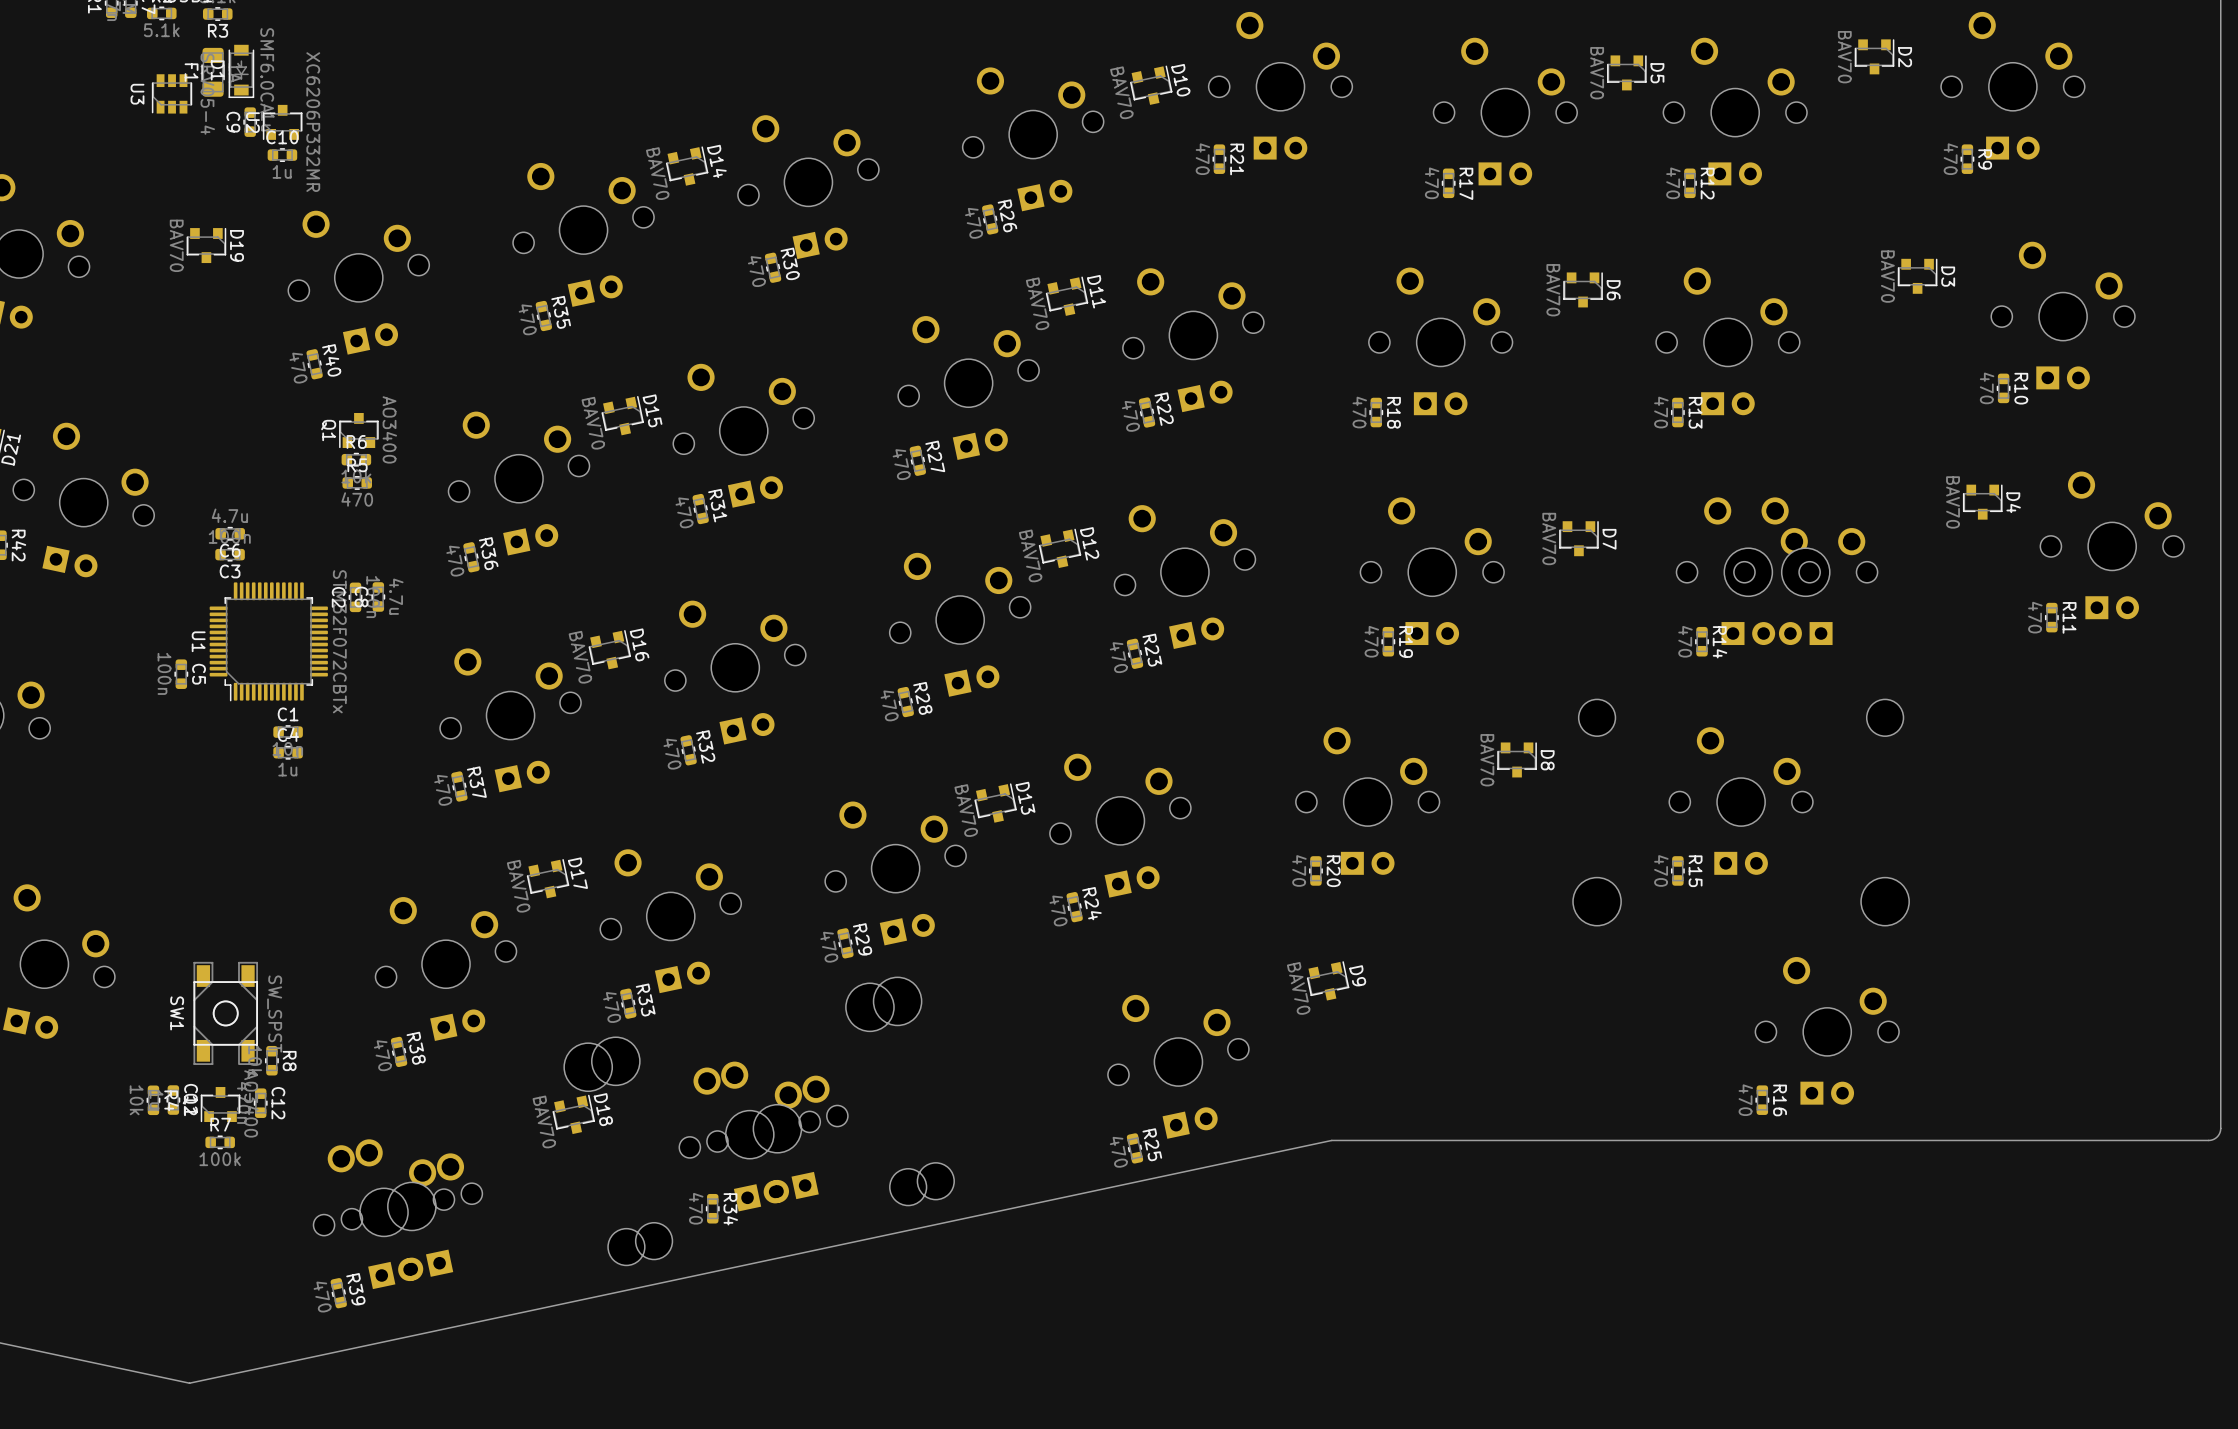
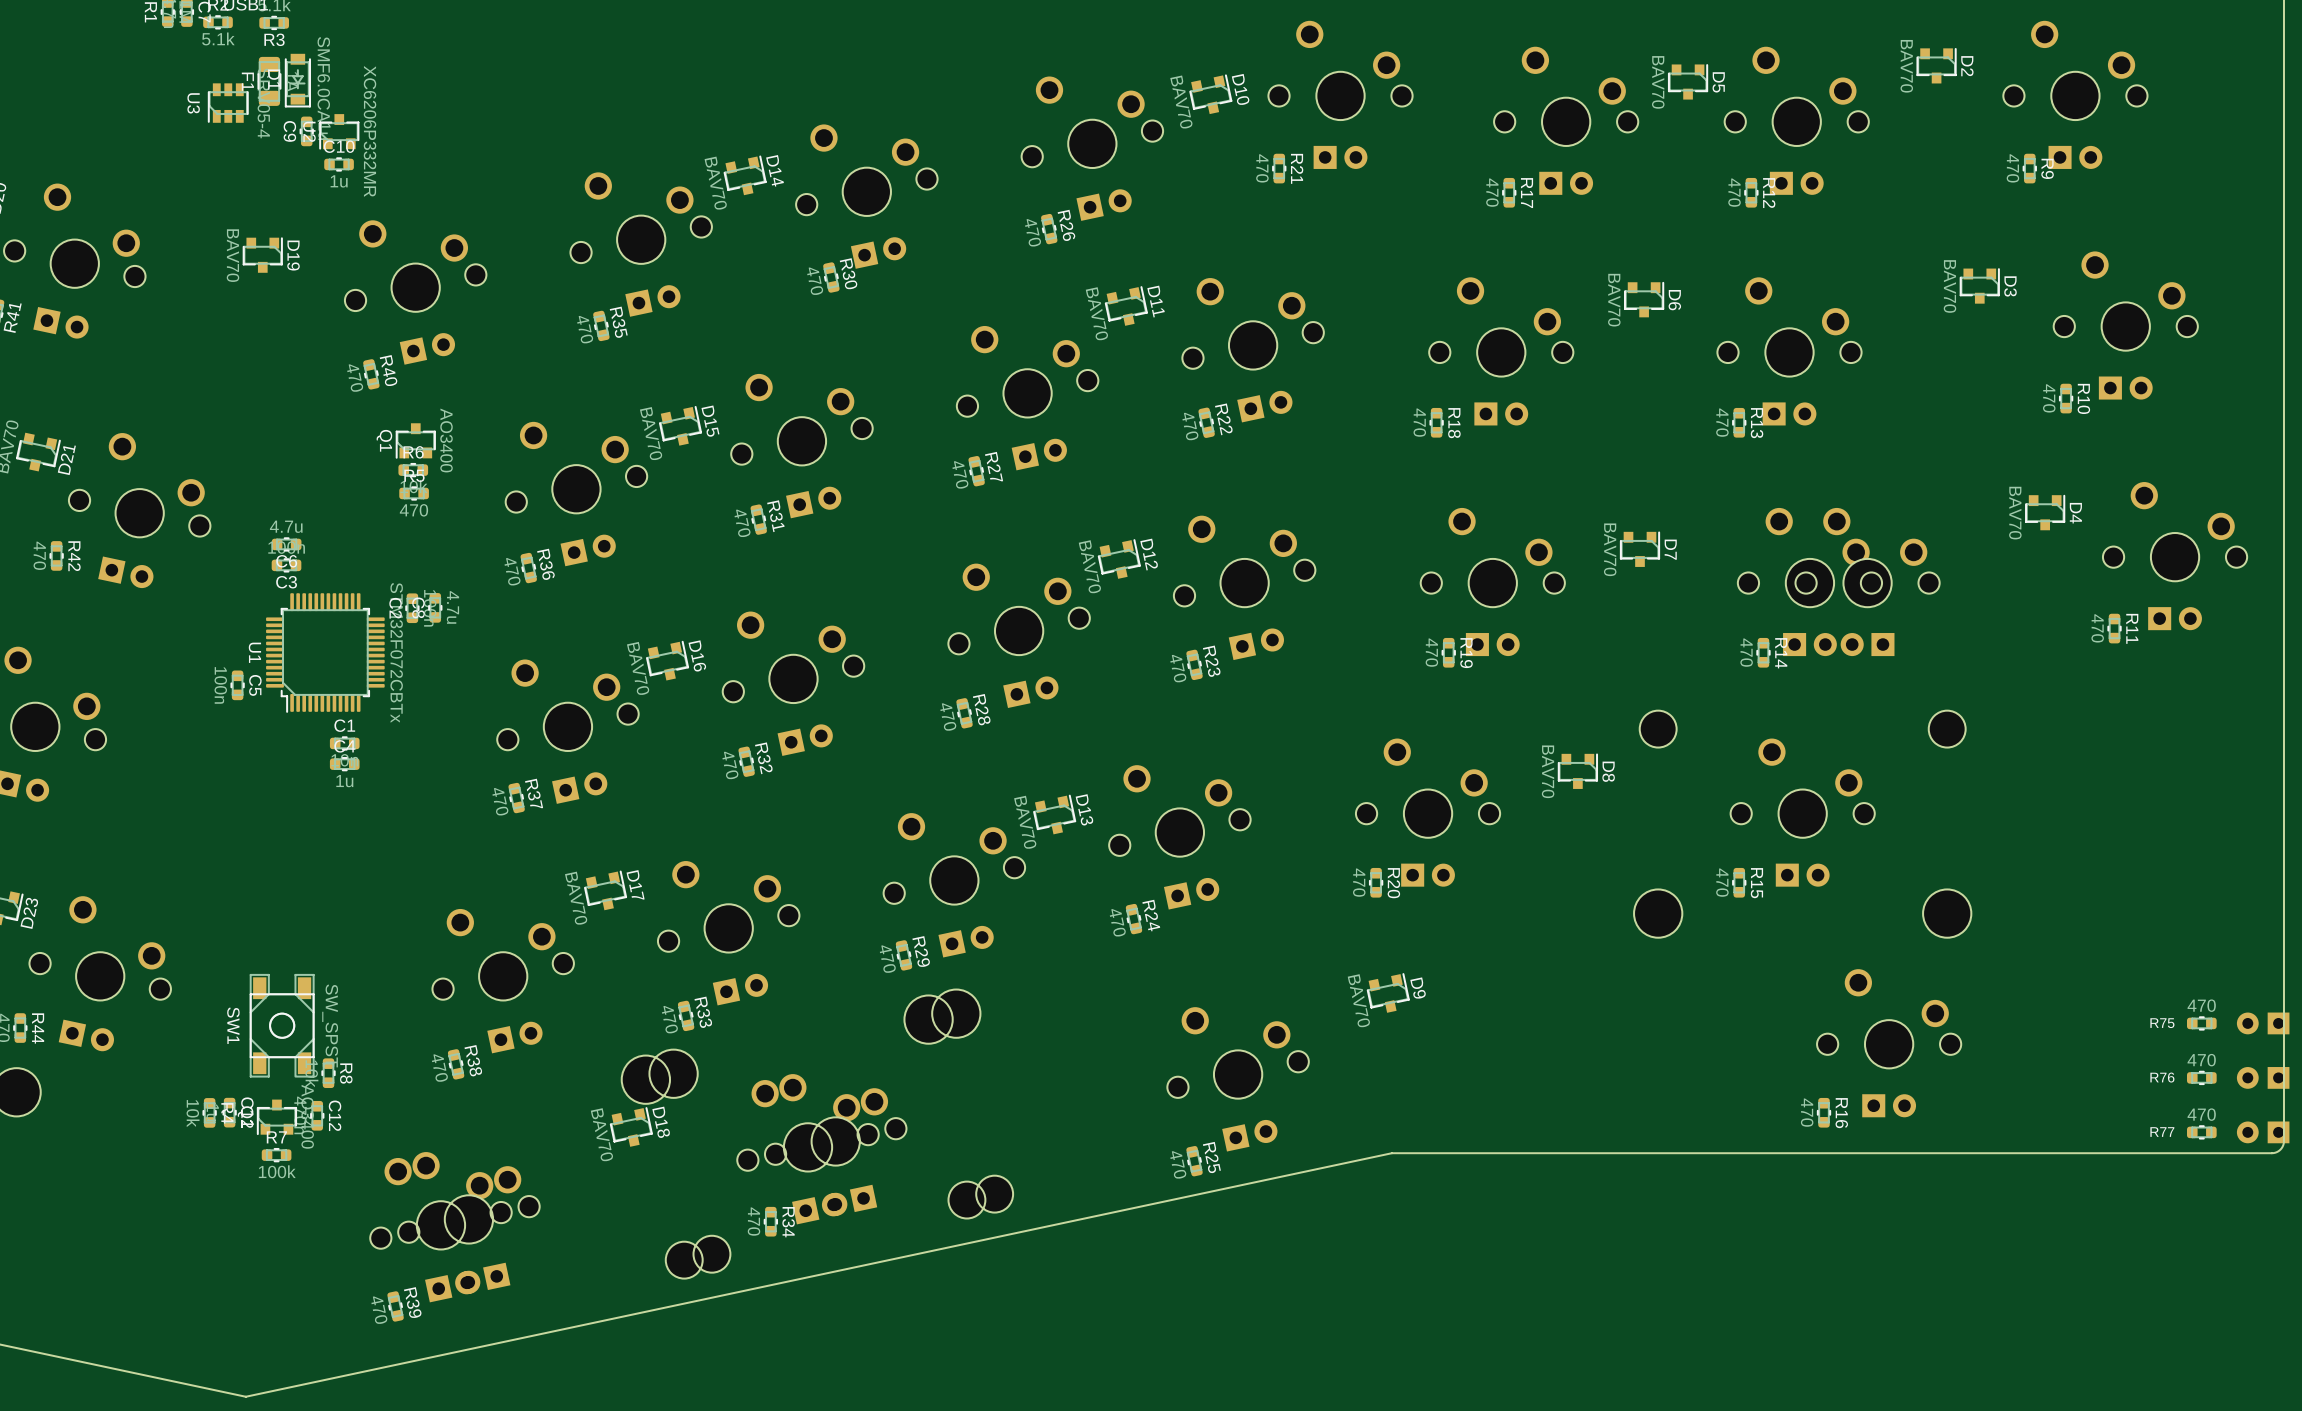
R75: none -> 470 (2201, 1023)
part: none -> (2263, 1023)
R76: none -> 470 (2201, 1077)
part: none -> (2263, 1077)
R77: none -> 470 (2201, 1132)
part: none -> (2263, 1132)

